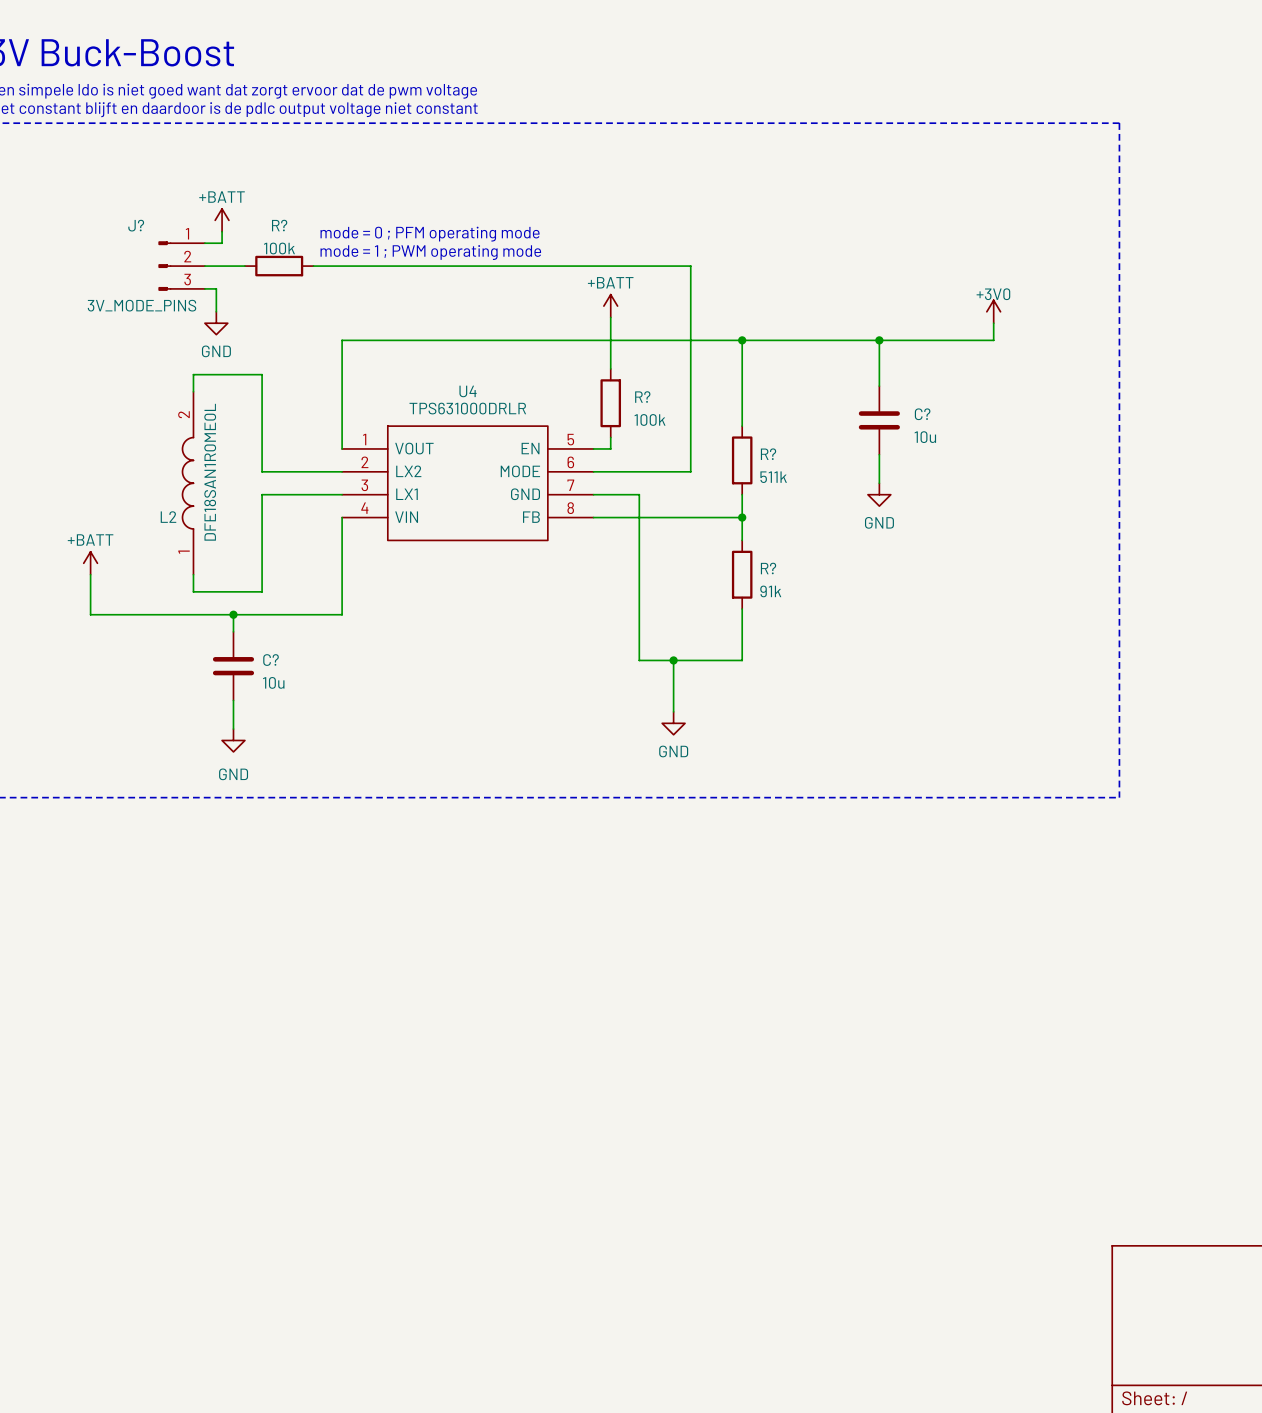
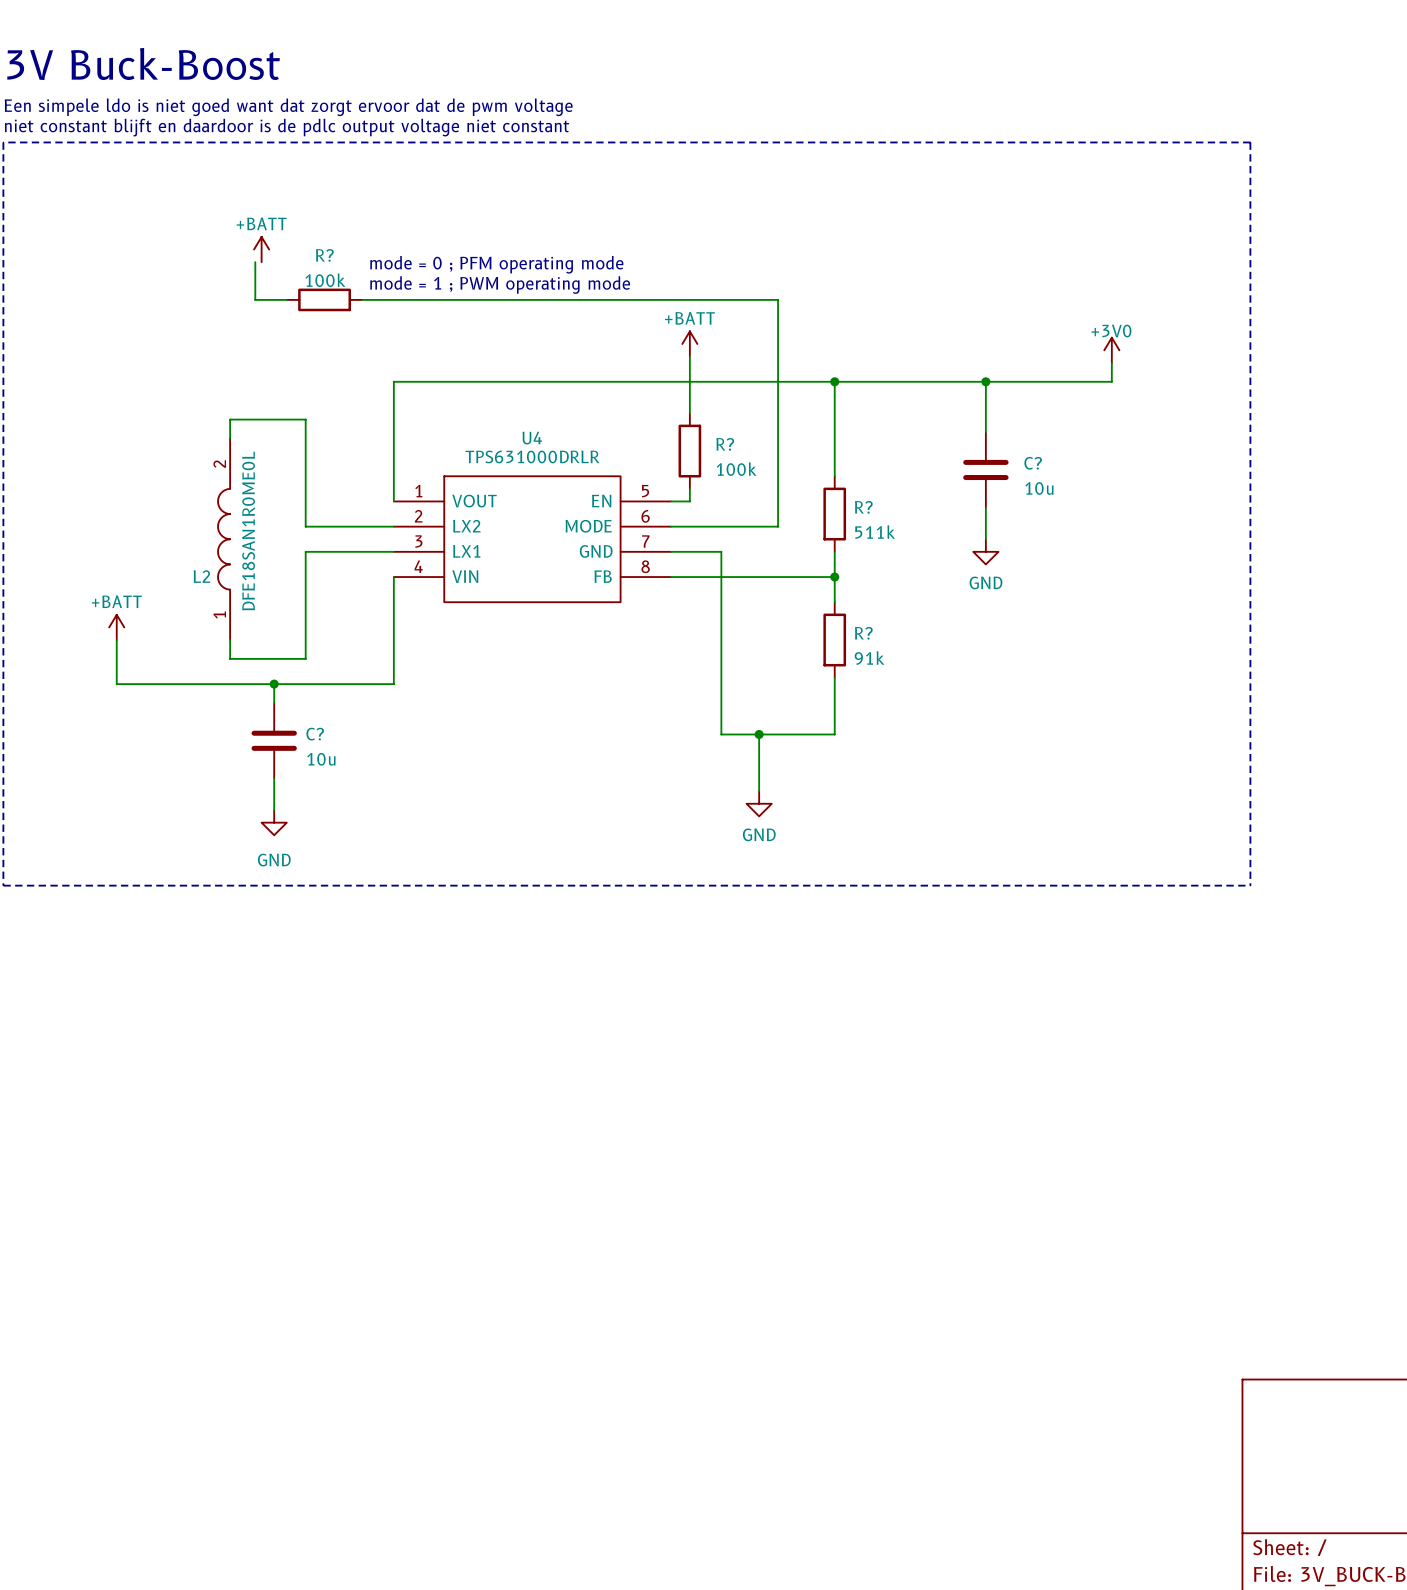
wire: (222, 231) (222, 243) (204, 243) -> none
J?: 3V_MODE_PINS (181, 266) -> none
wire: (204, 266) (216, 266) -> (255, 262) (255, 299)
wire: (204, 288) (216, 288) (216, 311) -> none
power symbol: GND (216, 323) -> none

